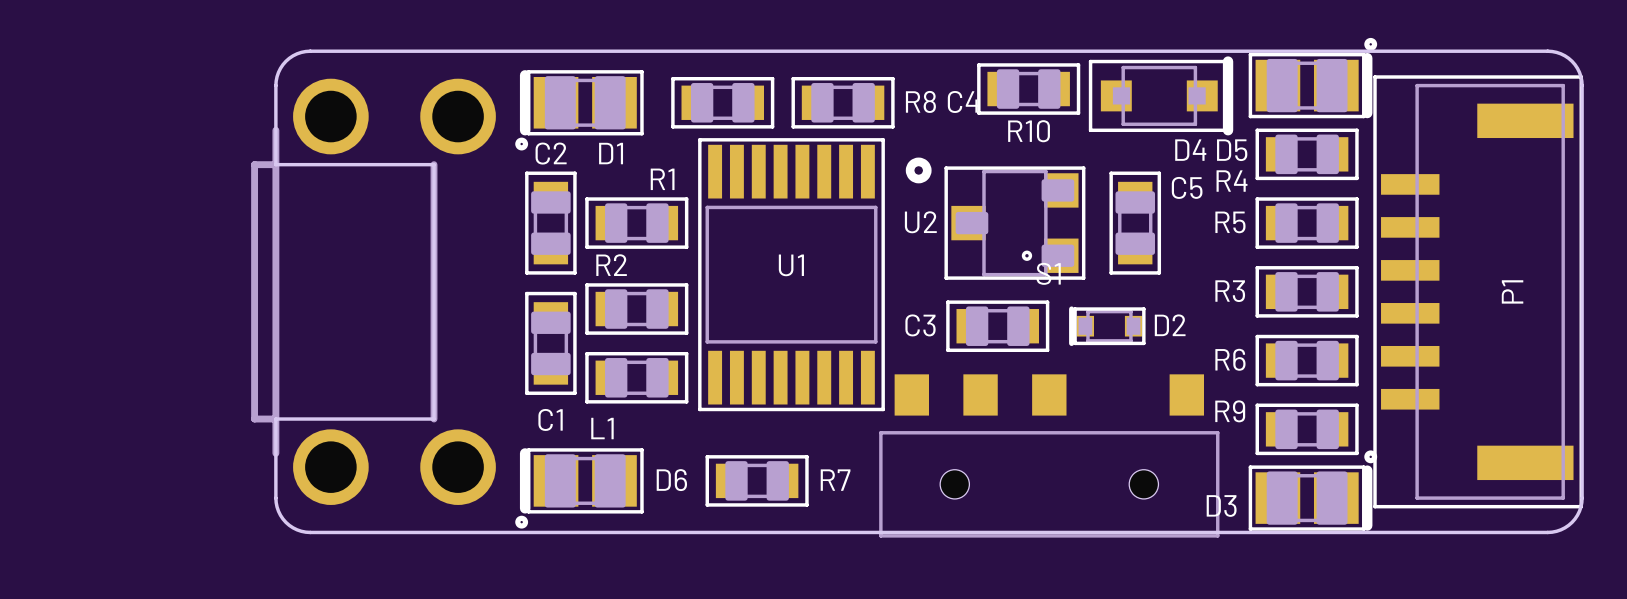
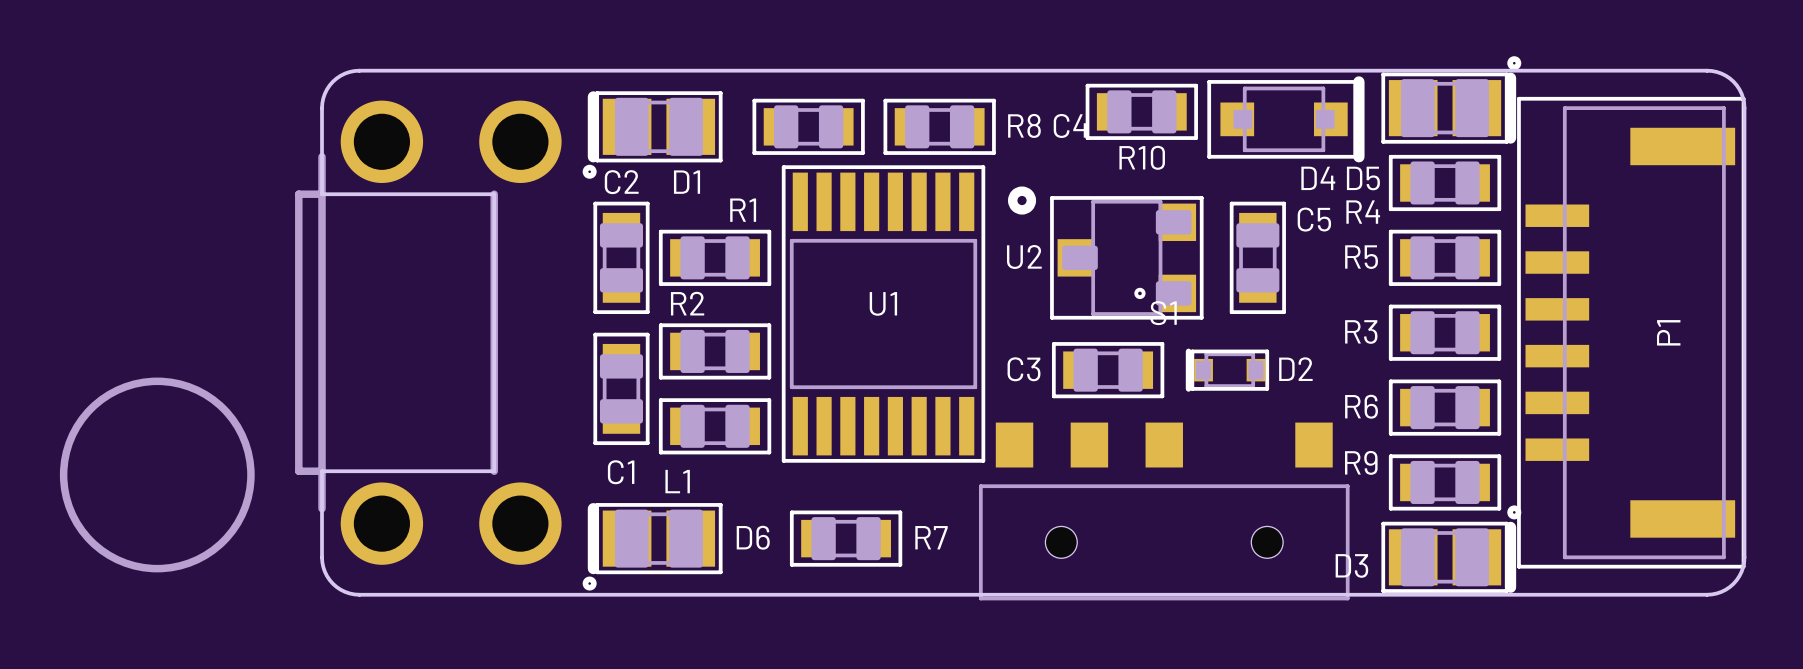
drawing: none -> [59, 377, 255, 573]

